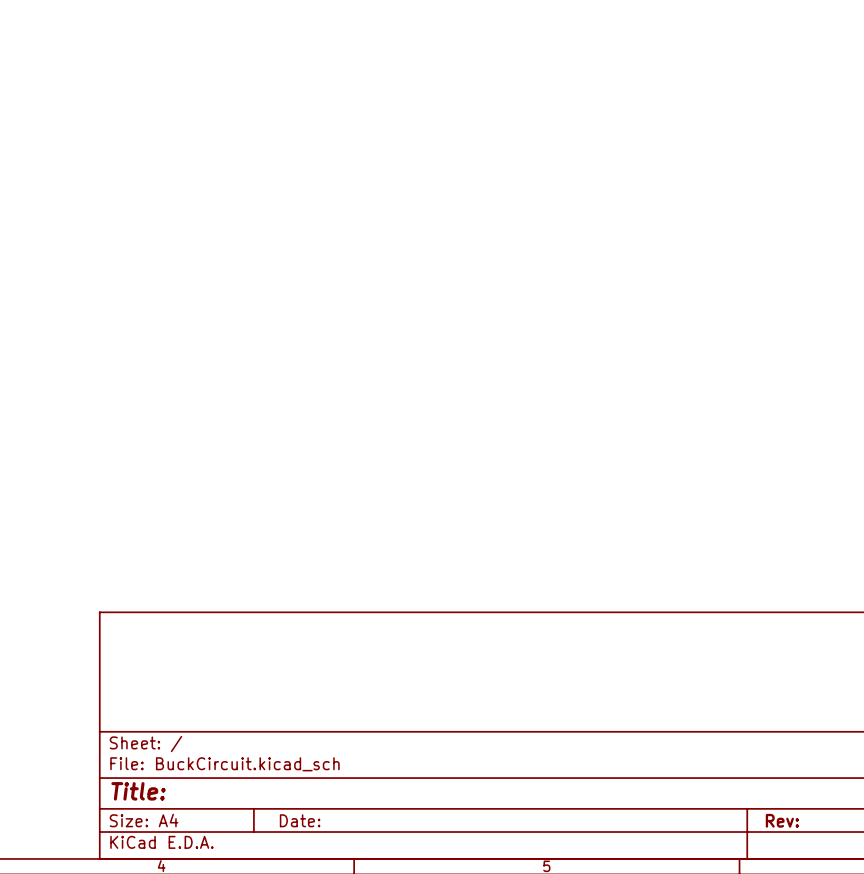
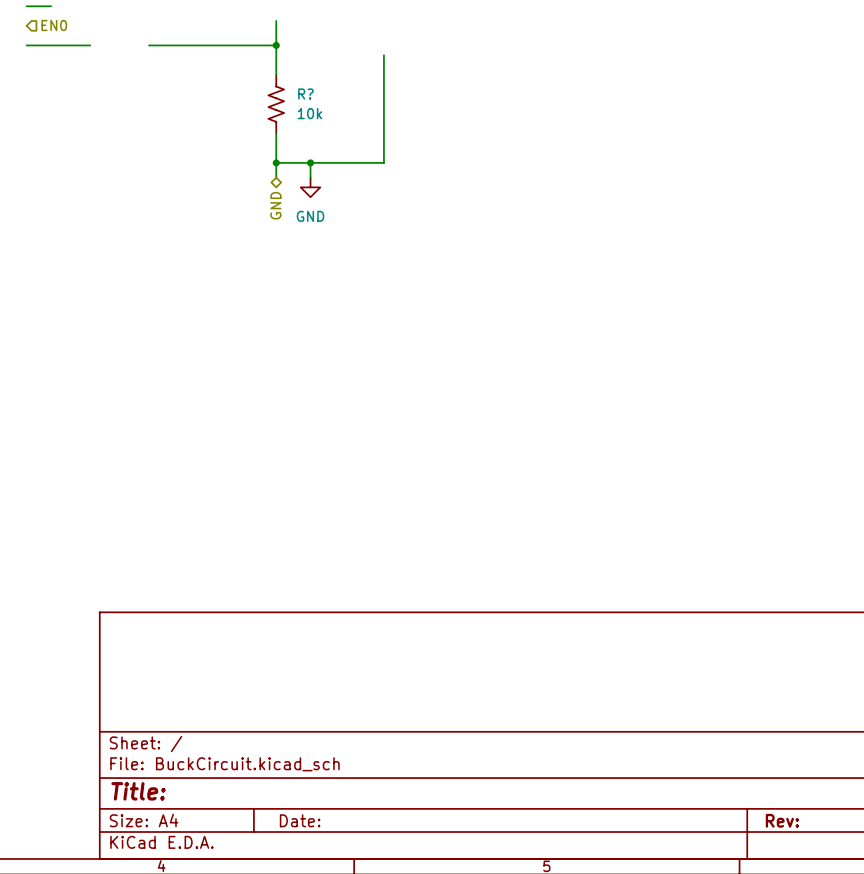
wire: none -> (26, 6) (51, 6)
wire: none -> (276, 20) (276, 74)
hierarchical label: none -> EN0 (54, 25)
wire: none -> (26, 45) (90, 45)
wire: none -> (149, 45) (276, 45)
junction: none -> (276, 45)
wire: none -> (383, 55) (383, 162) (276, 162)
R?: none -> 10k (276, 104)
wire: none -> (276, 133) (276, 177)
junction: none -> (276, 162)
wire: none -> (310, 162) (310, 177)
junction: none -> (310, 162)
power symbol: none -> GND (310, 187)
hierarchical label: none -> GND (275, 205)

